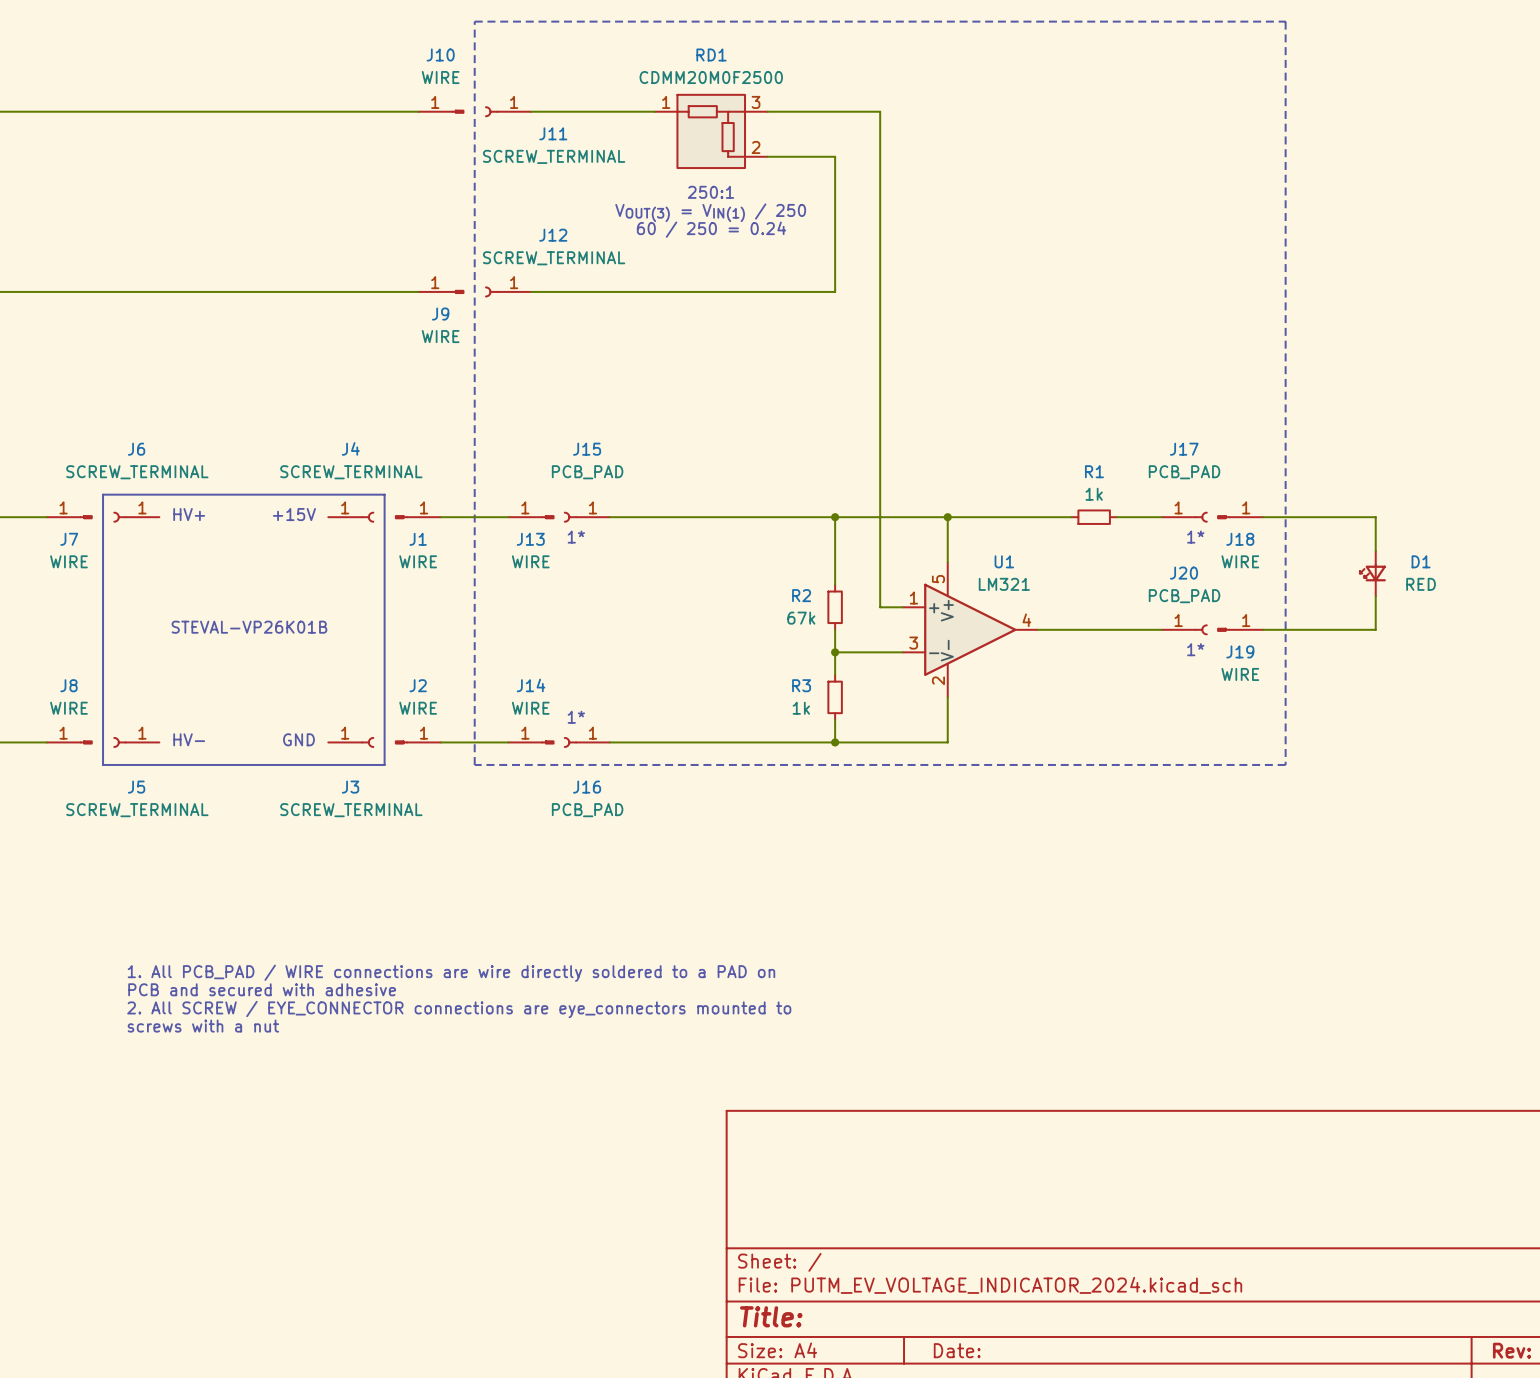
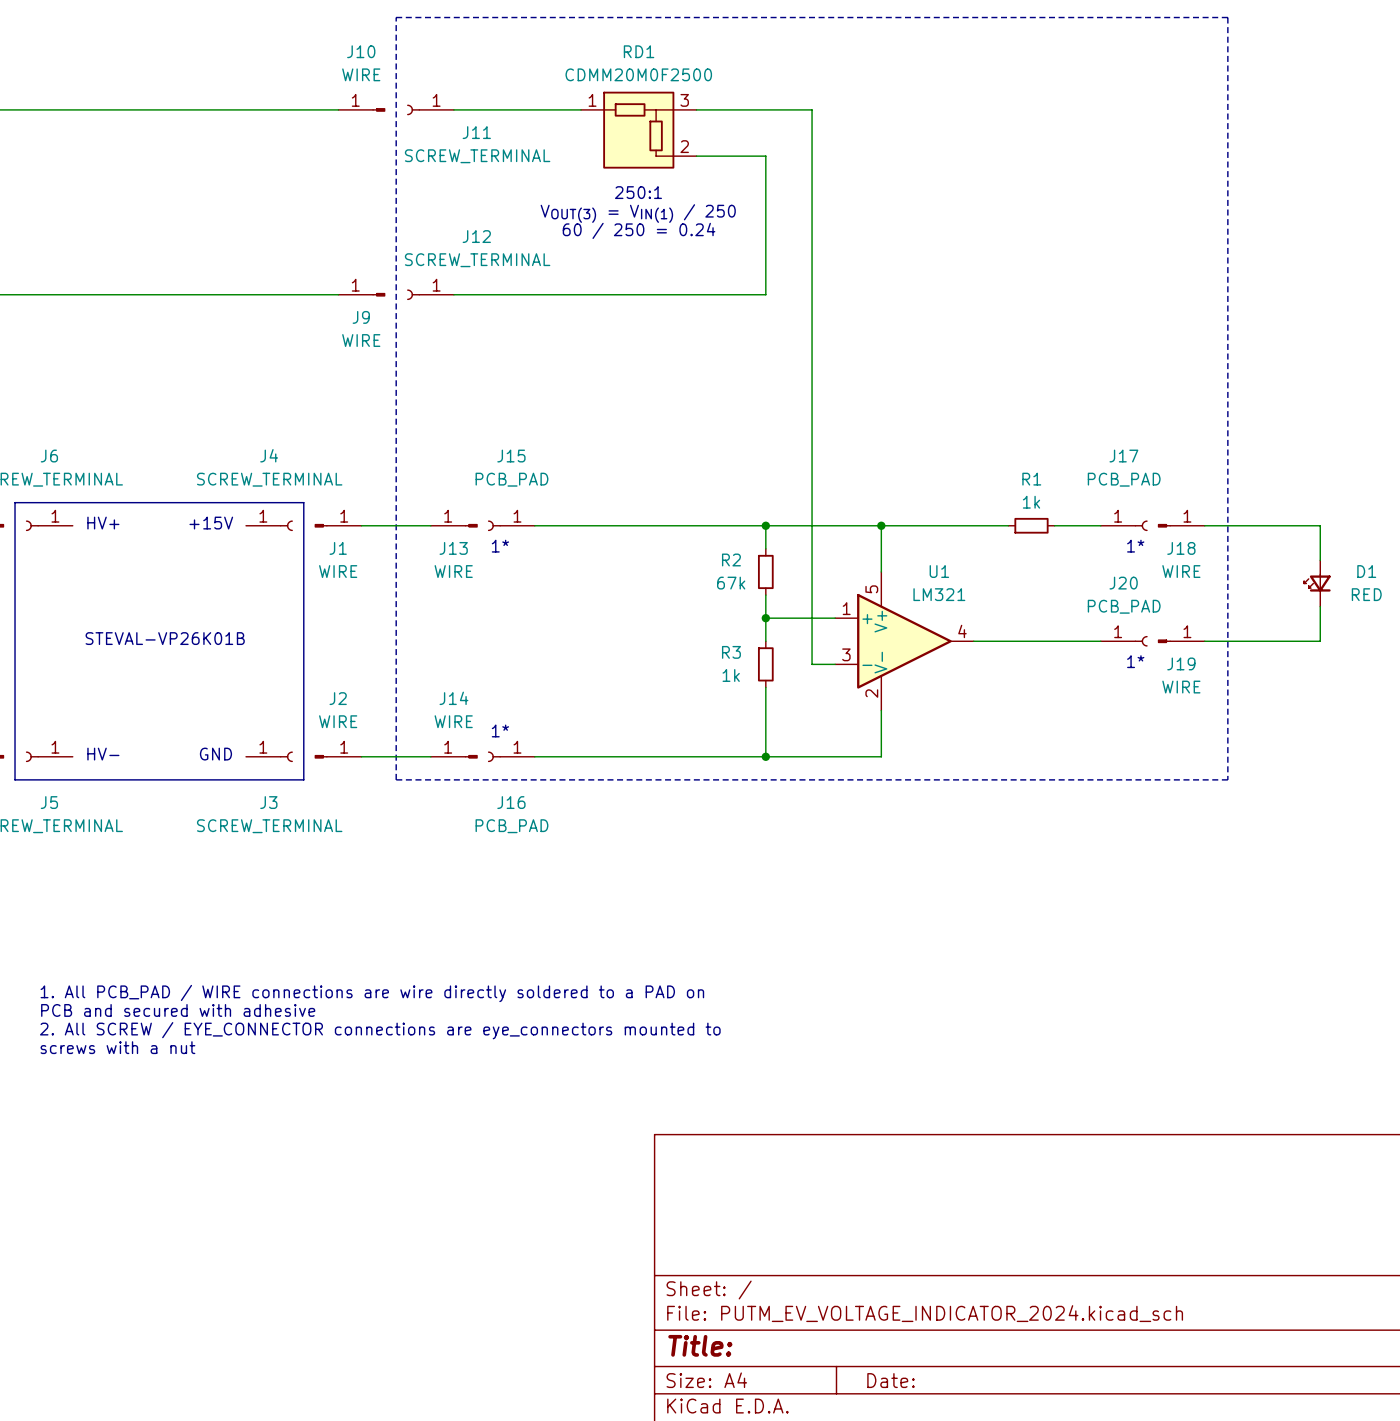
wire: (835, 539) (835, 584) -> (765, 687) (765, 733)
R2 position: (835, 607) -> (765, 571)
wire: (835, 629) (835, 674) -> (765, 641) (765, 595)
wire: (835, 652) (880, 652) -> (765, 618) (812, 618) (812, 664)
junction position: (835, 652) -> (765, 618)
R3 position: (835, 697) -> (765, 664)

